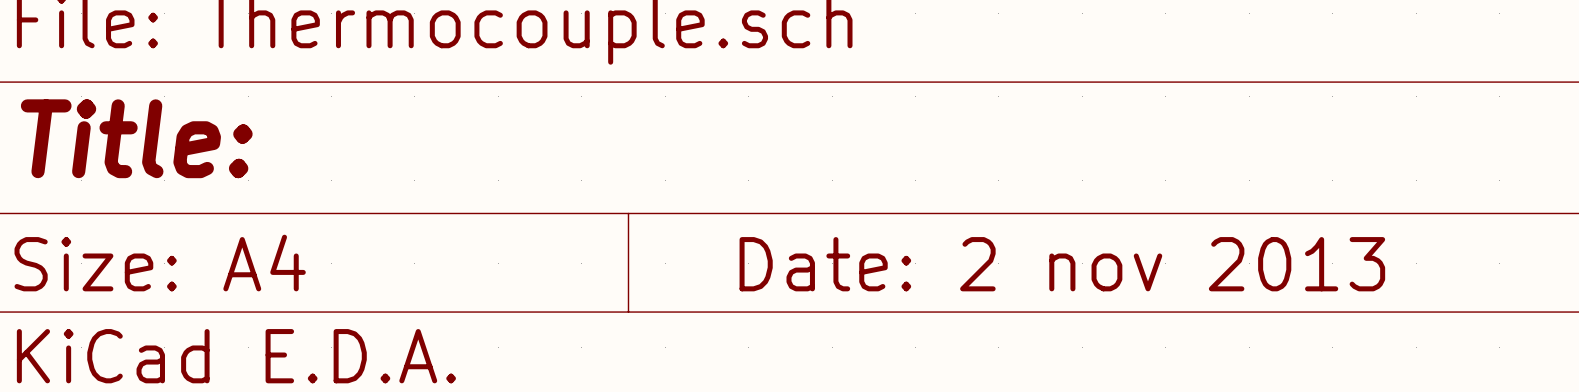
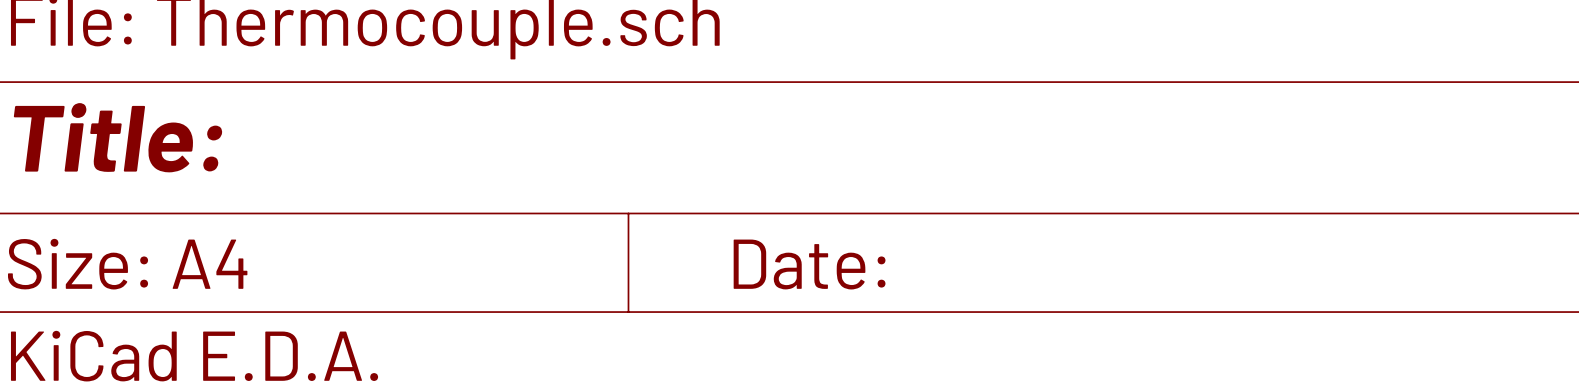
title block: Date: 2 nov 2013 (1062, 264) -> Date: (809, 264)

